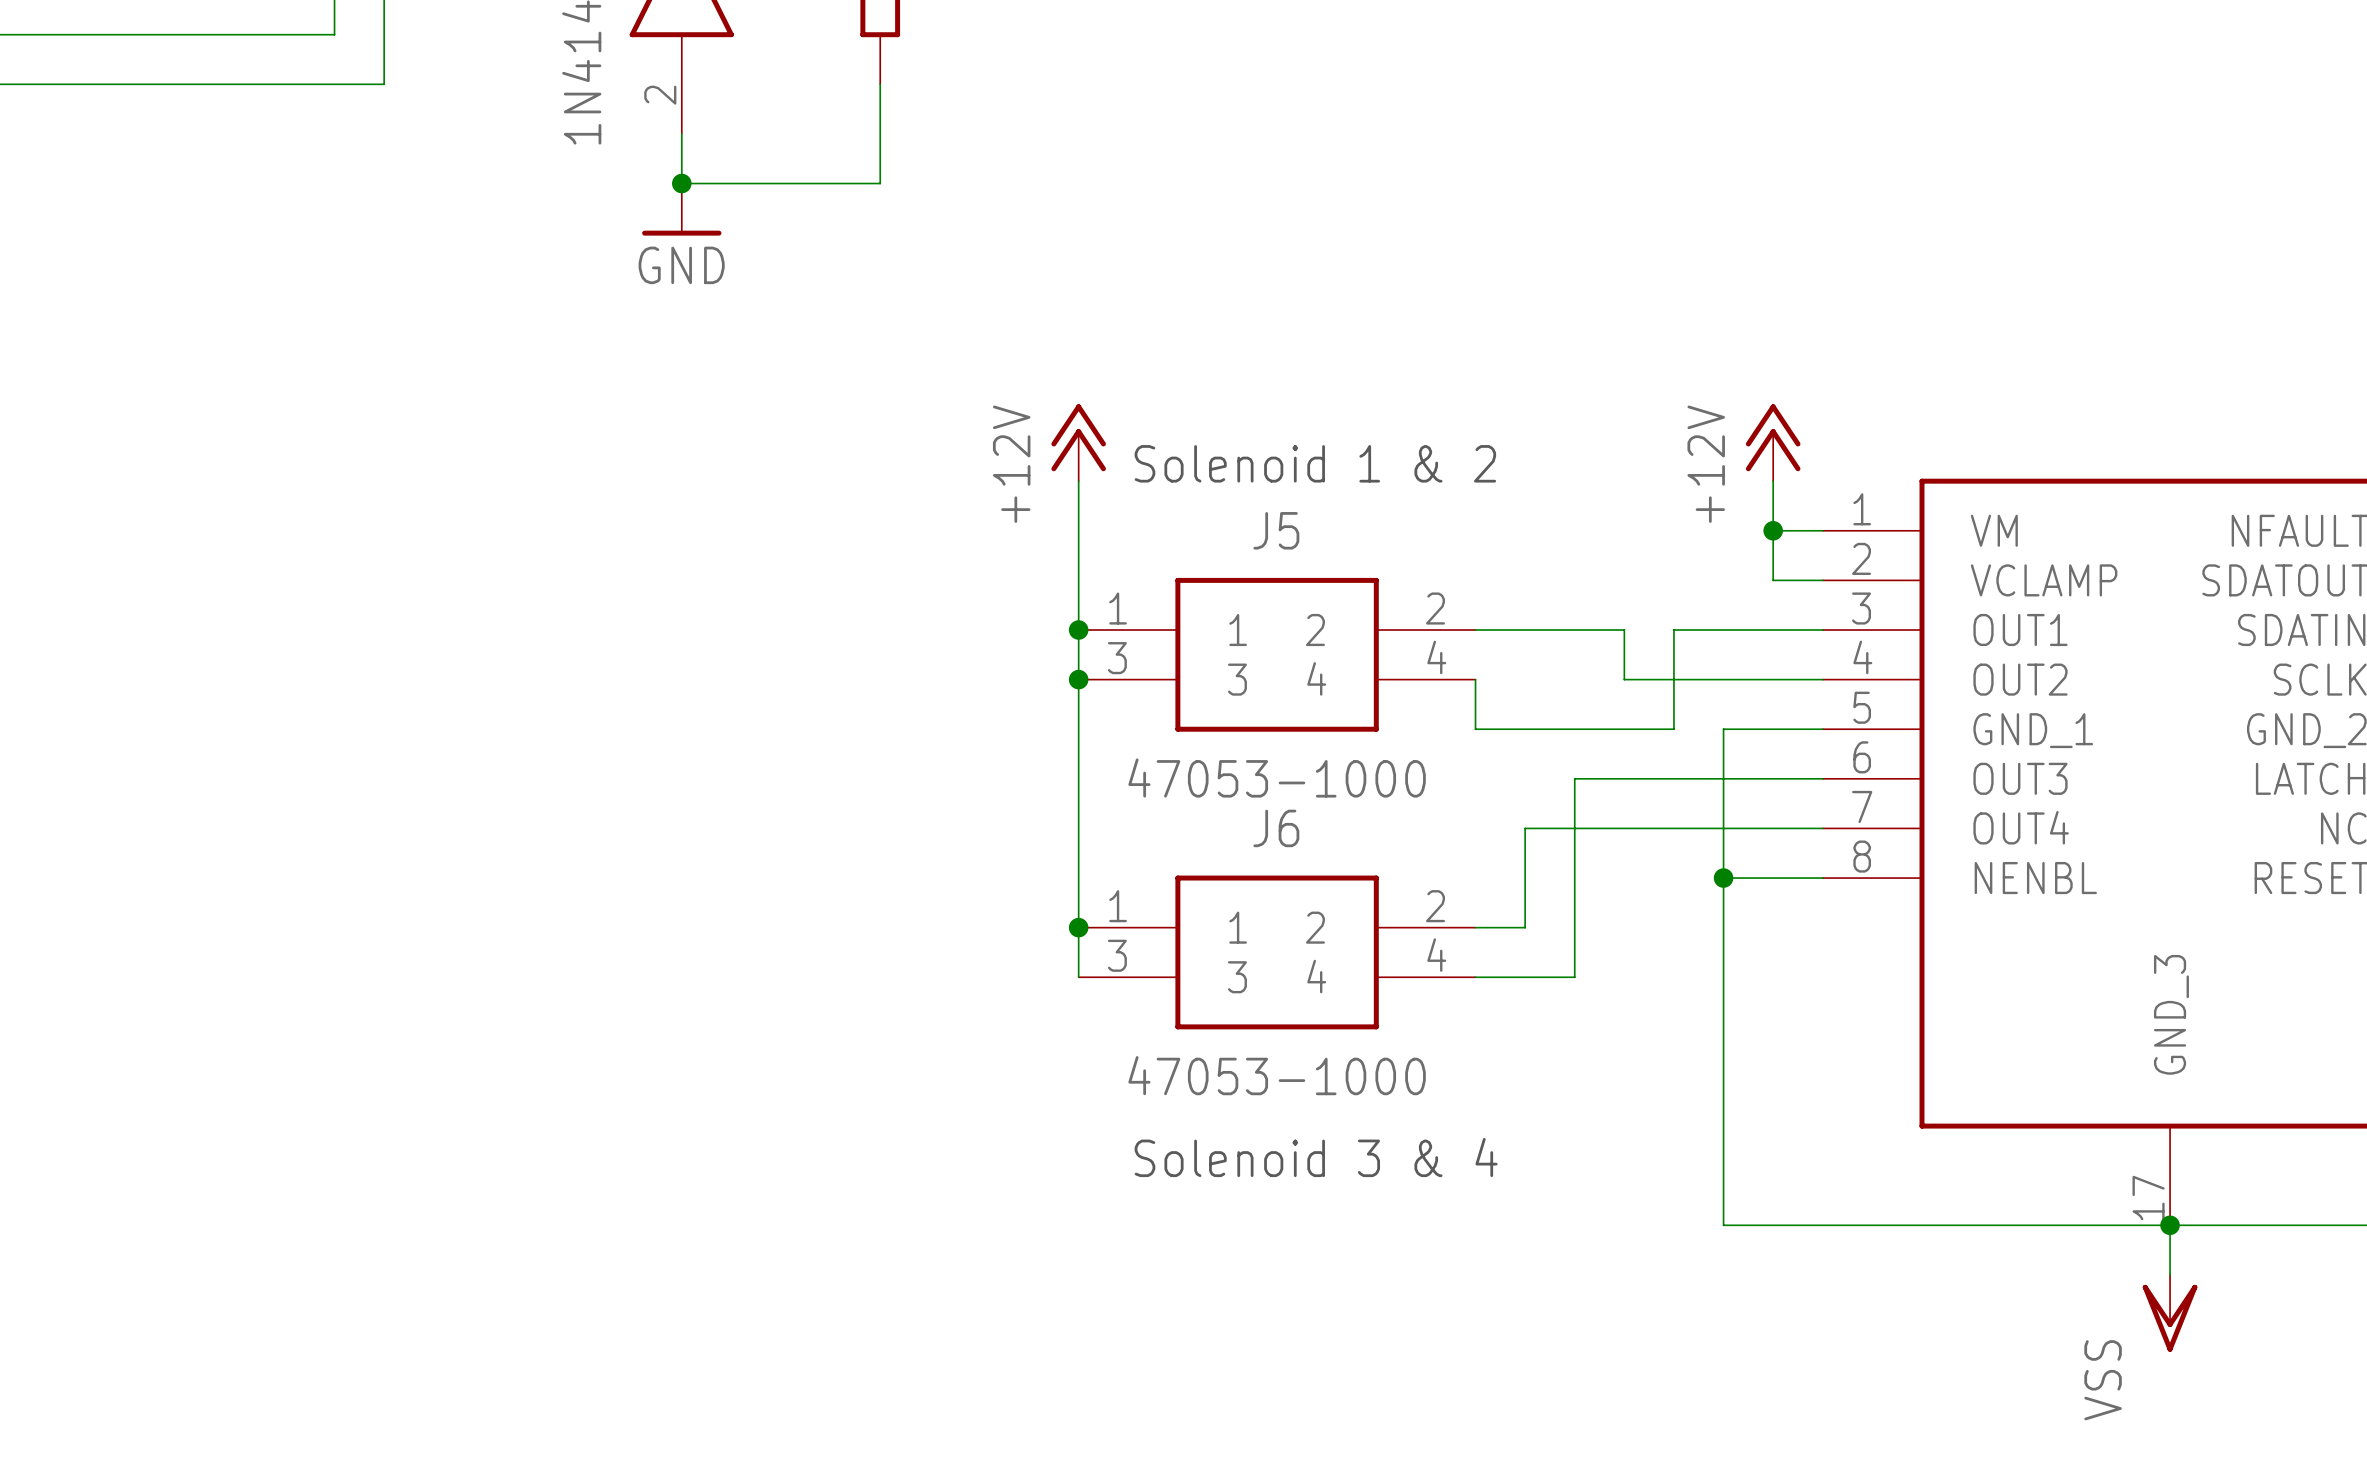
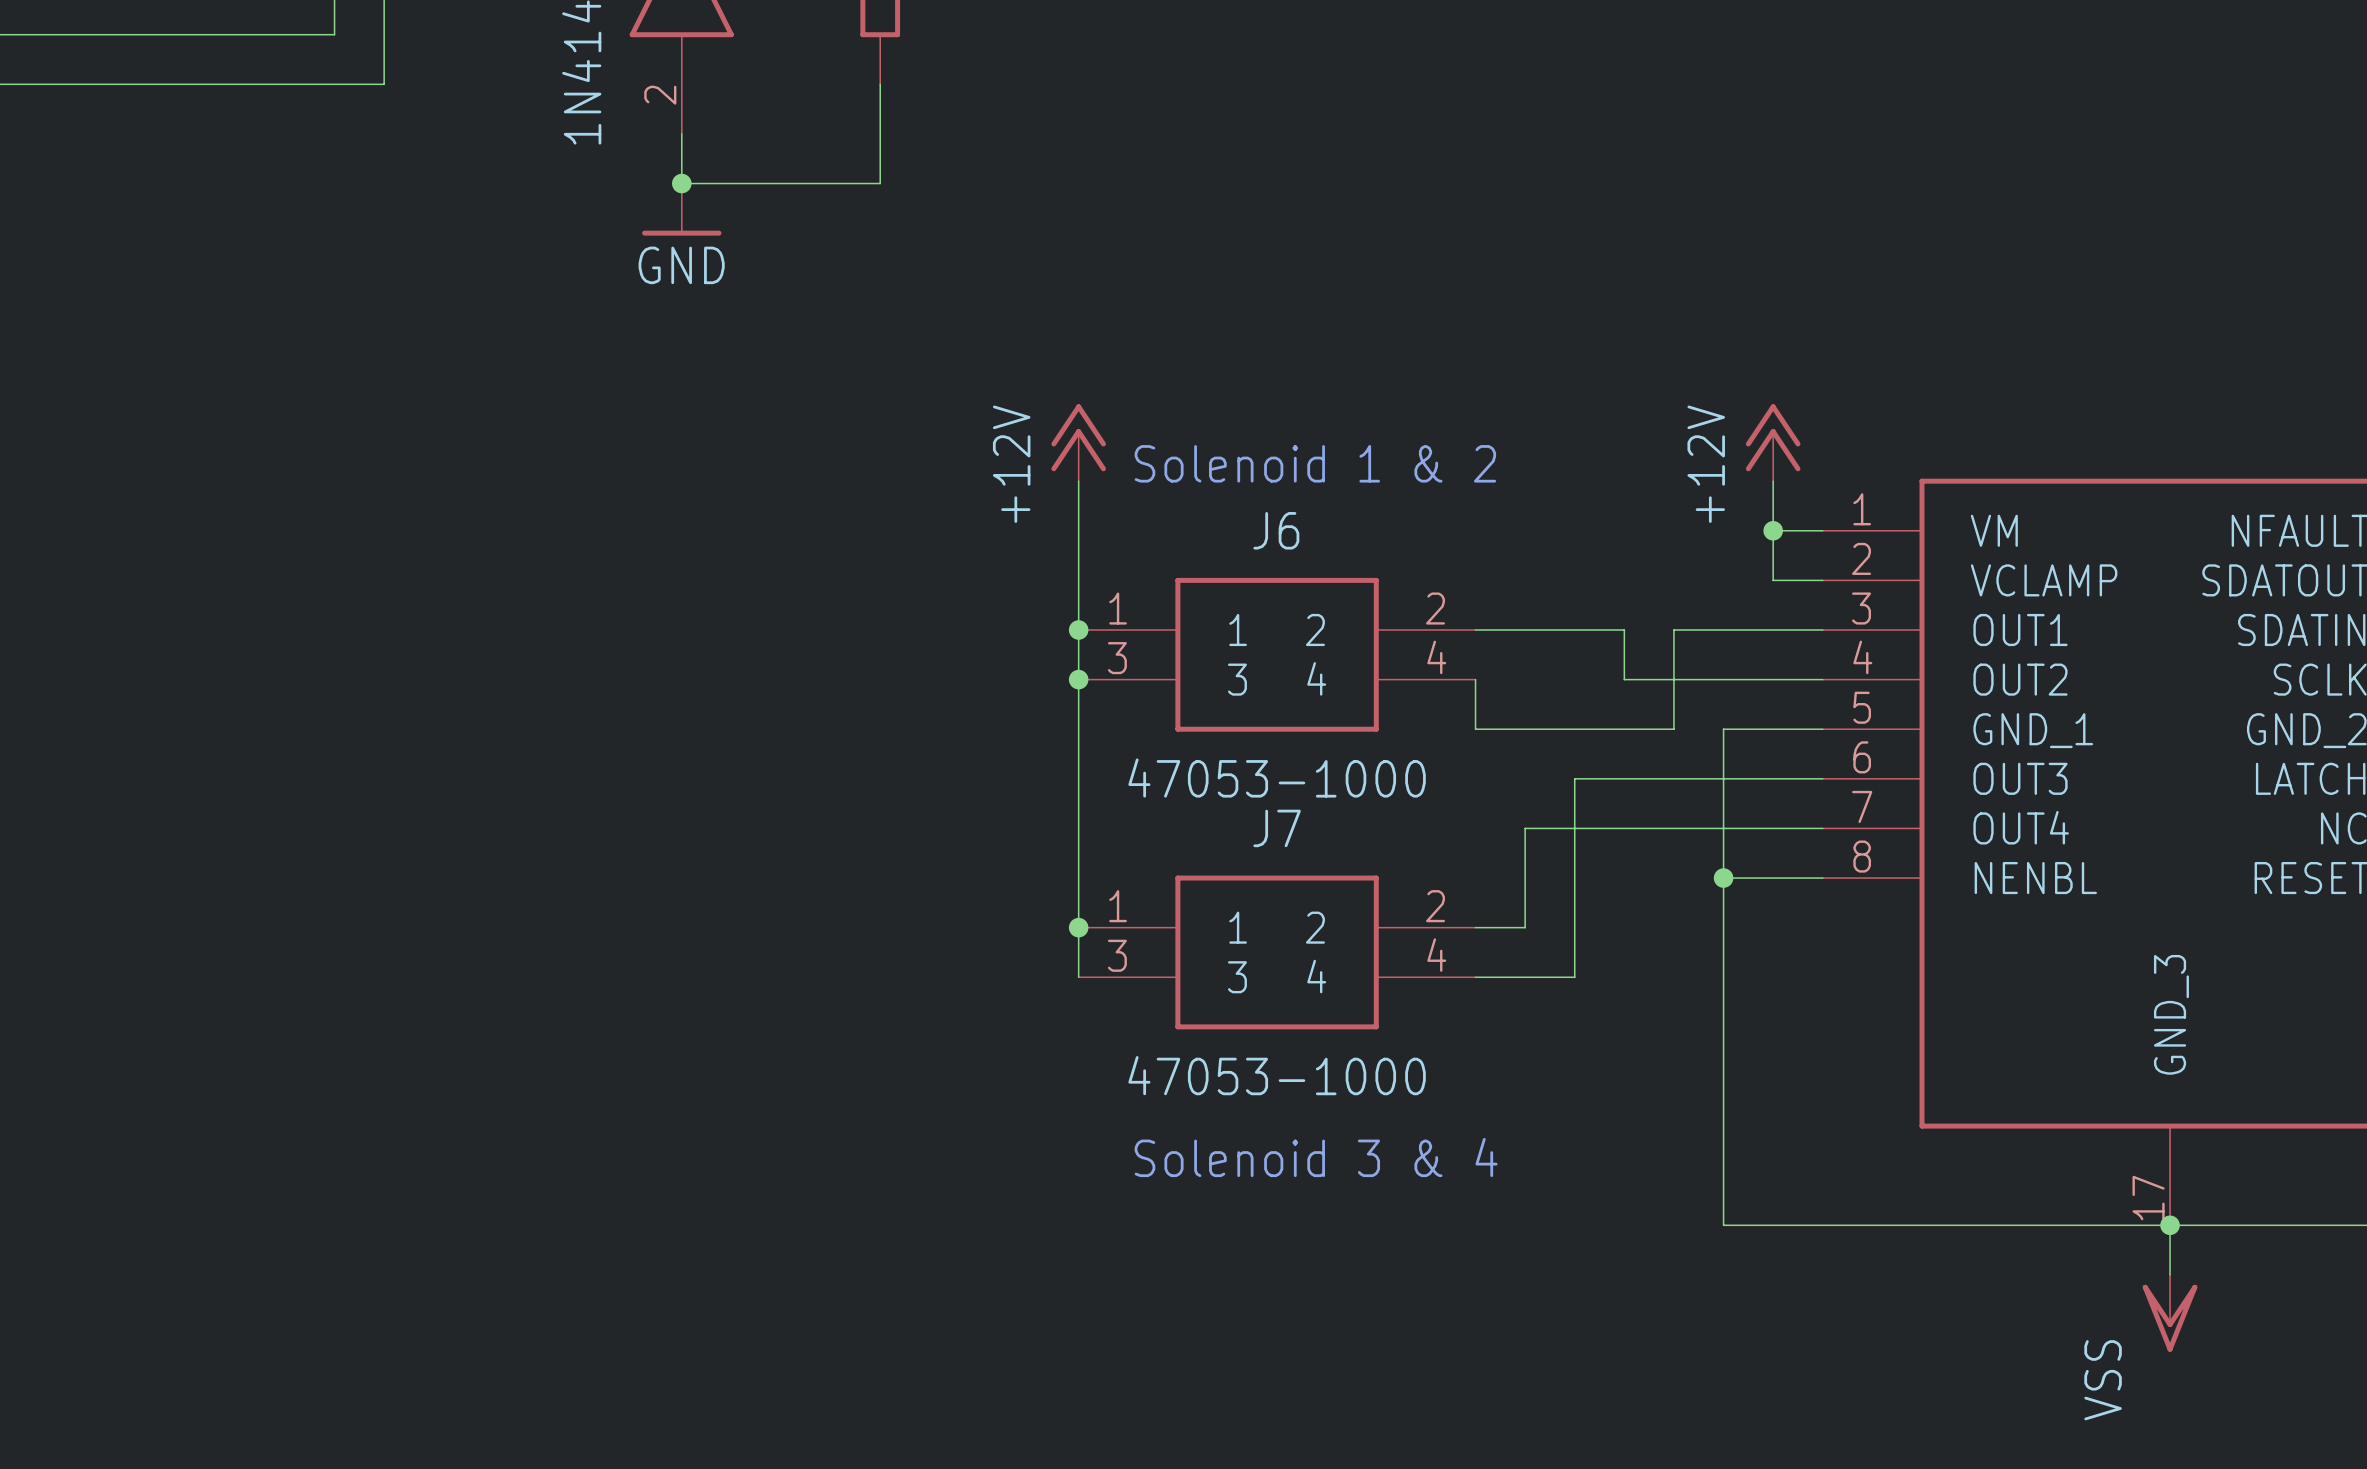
J5 name: J5 (1276, 530) -> J6 (1276, 530)
J6 name: J6 (1276, 828) -> J7 (1277, 828)

